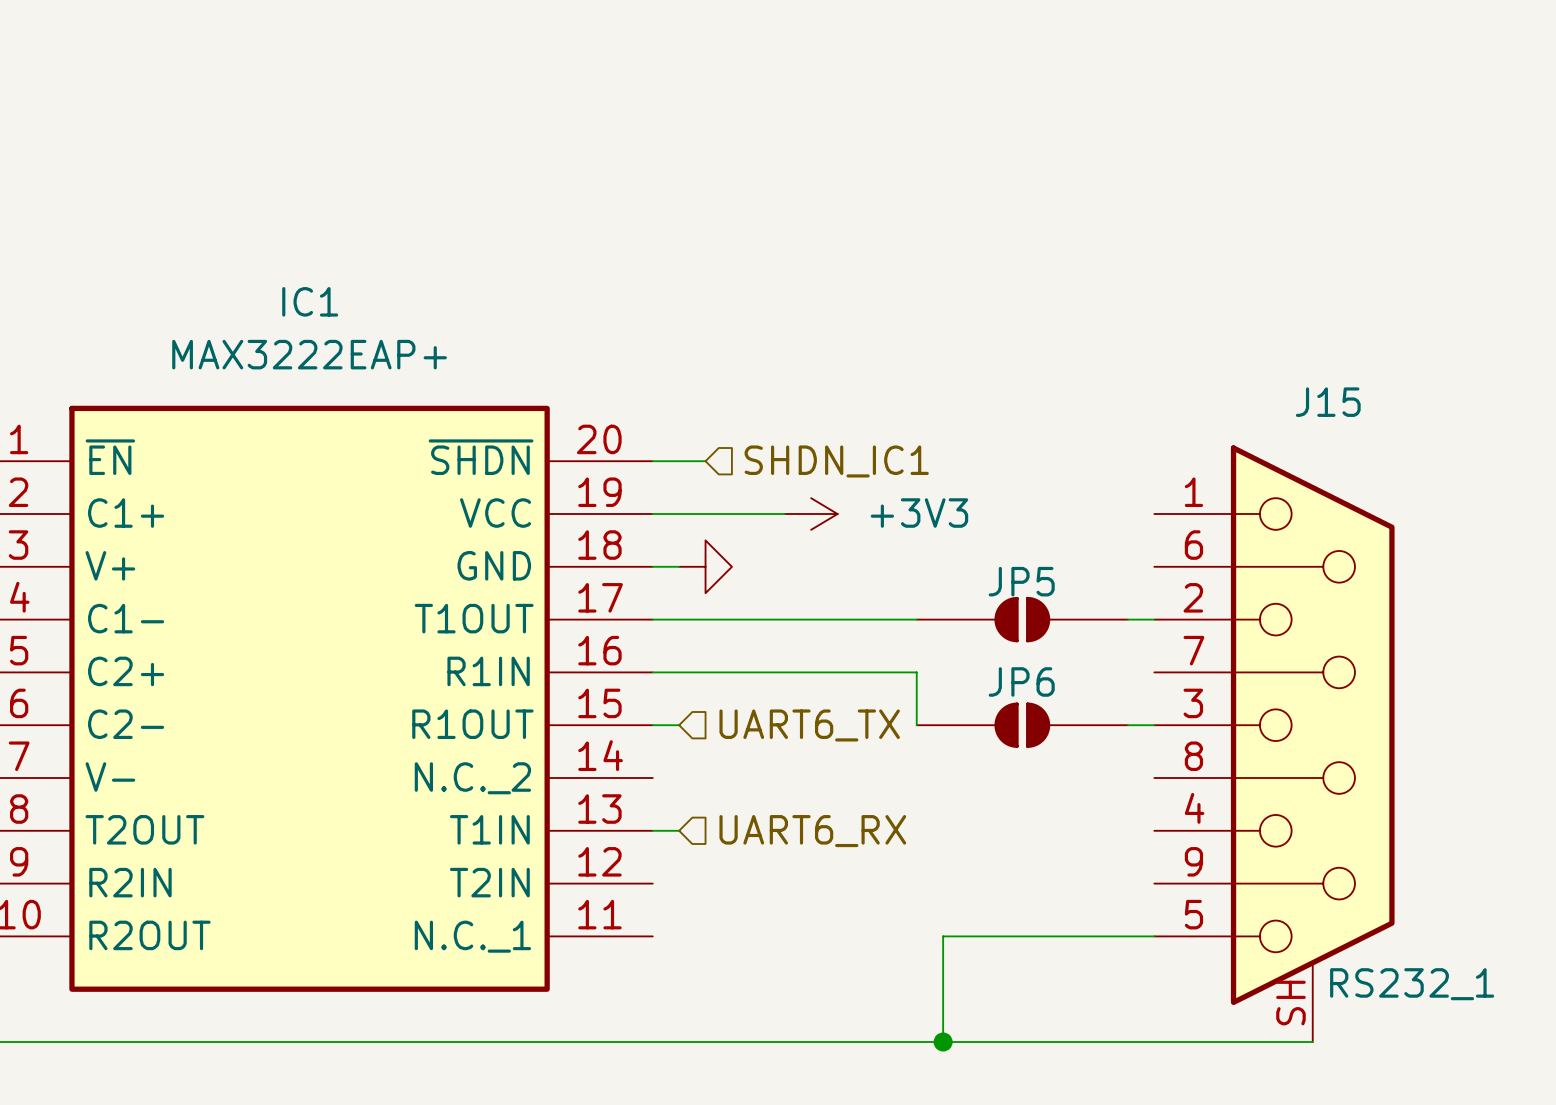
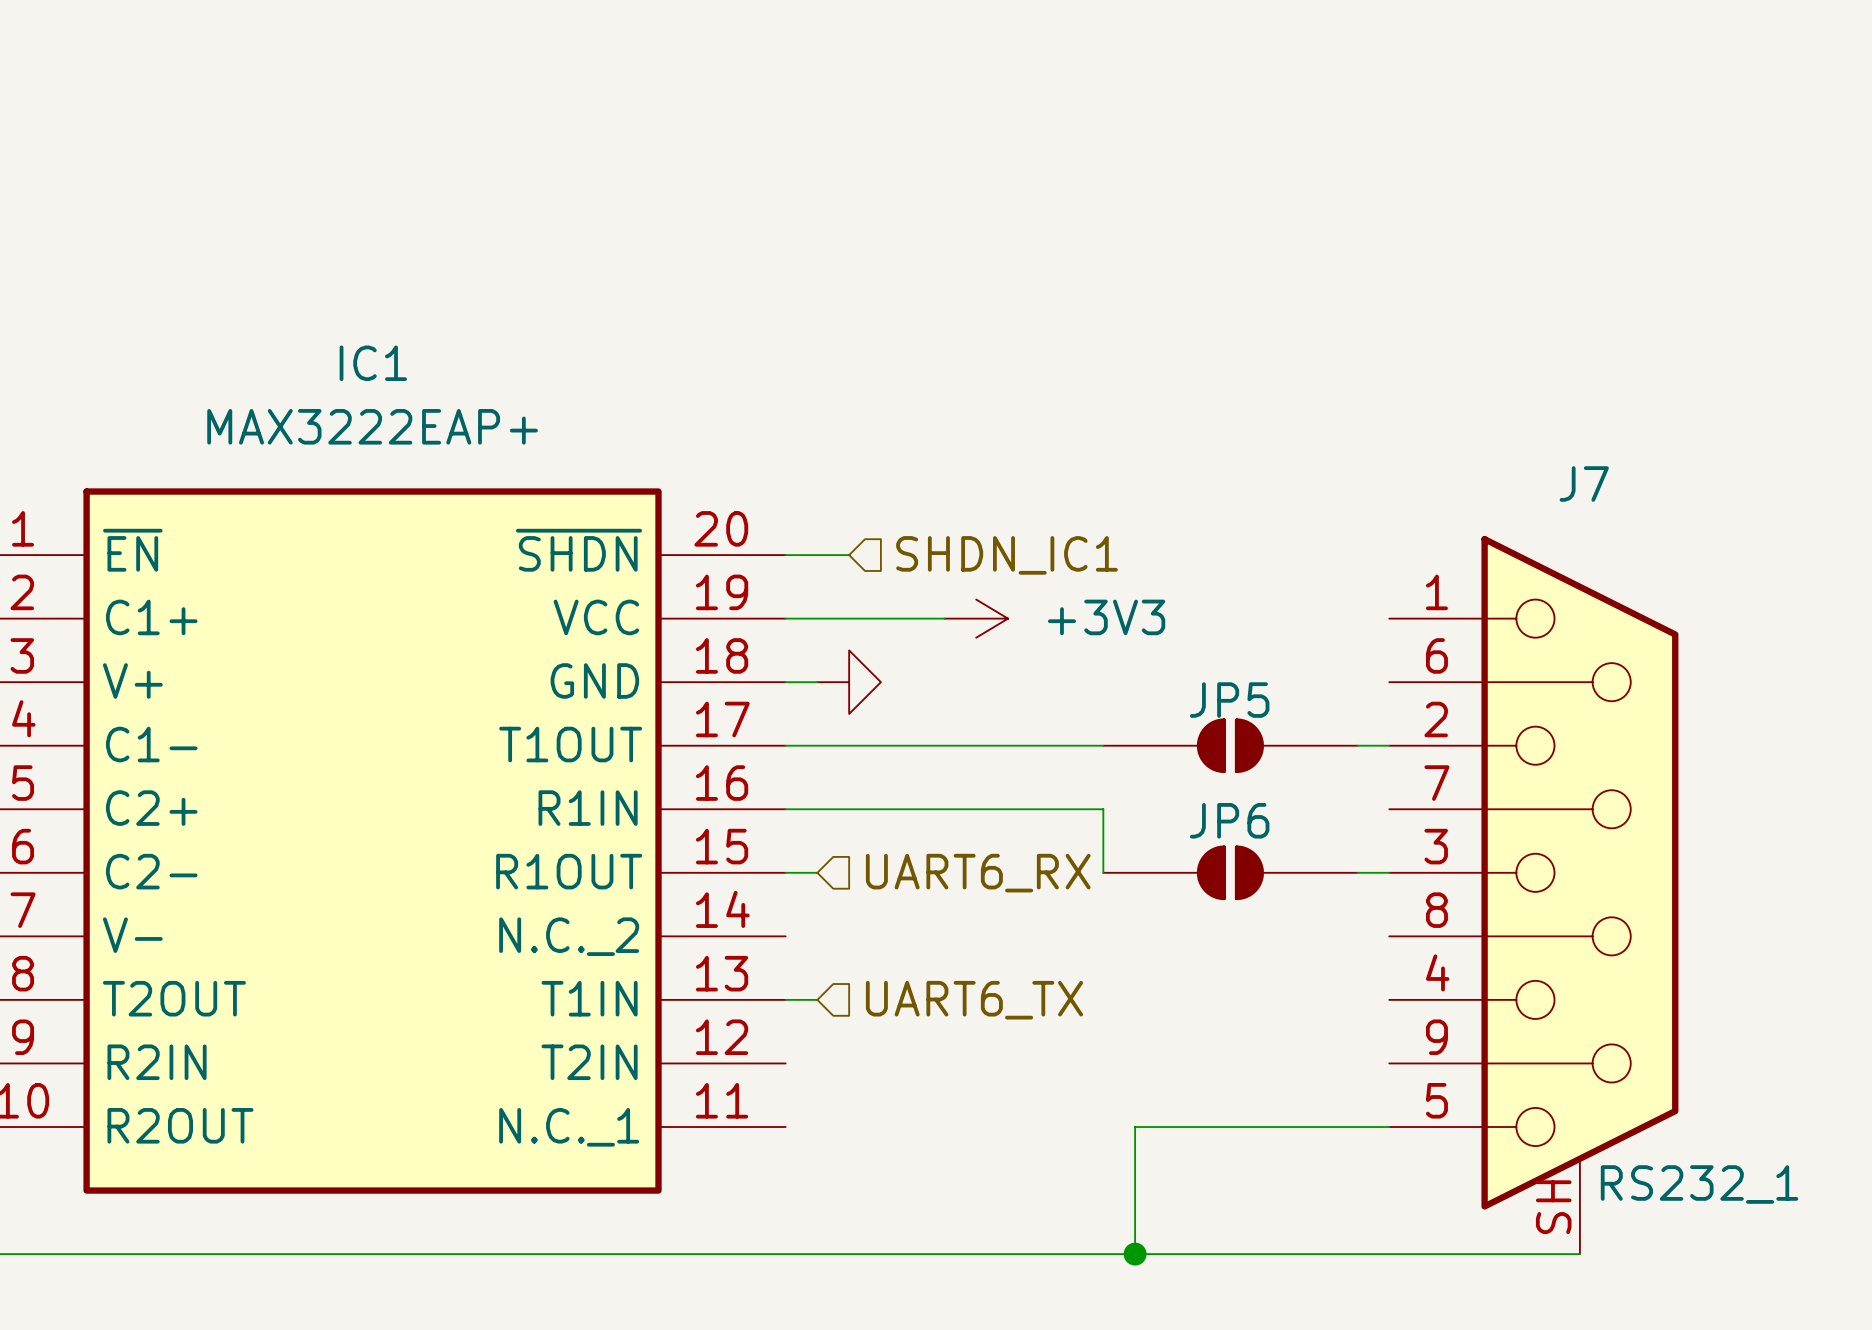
J15 name: J15 (1328, 402) -> J7 (1584, 483)
hierarchical label: UART6_TX (809, 725) -> UART6_RX (978, 873)
hierarchical label: UART6_RX (812, 831) -> UART6_TX (974, 1000)

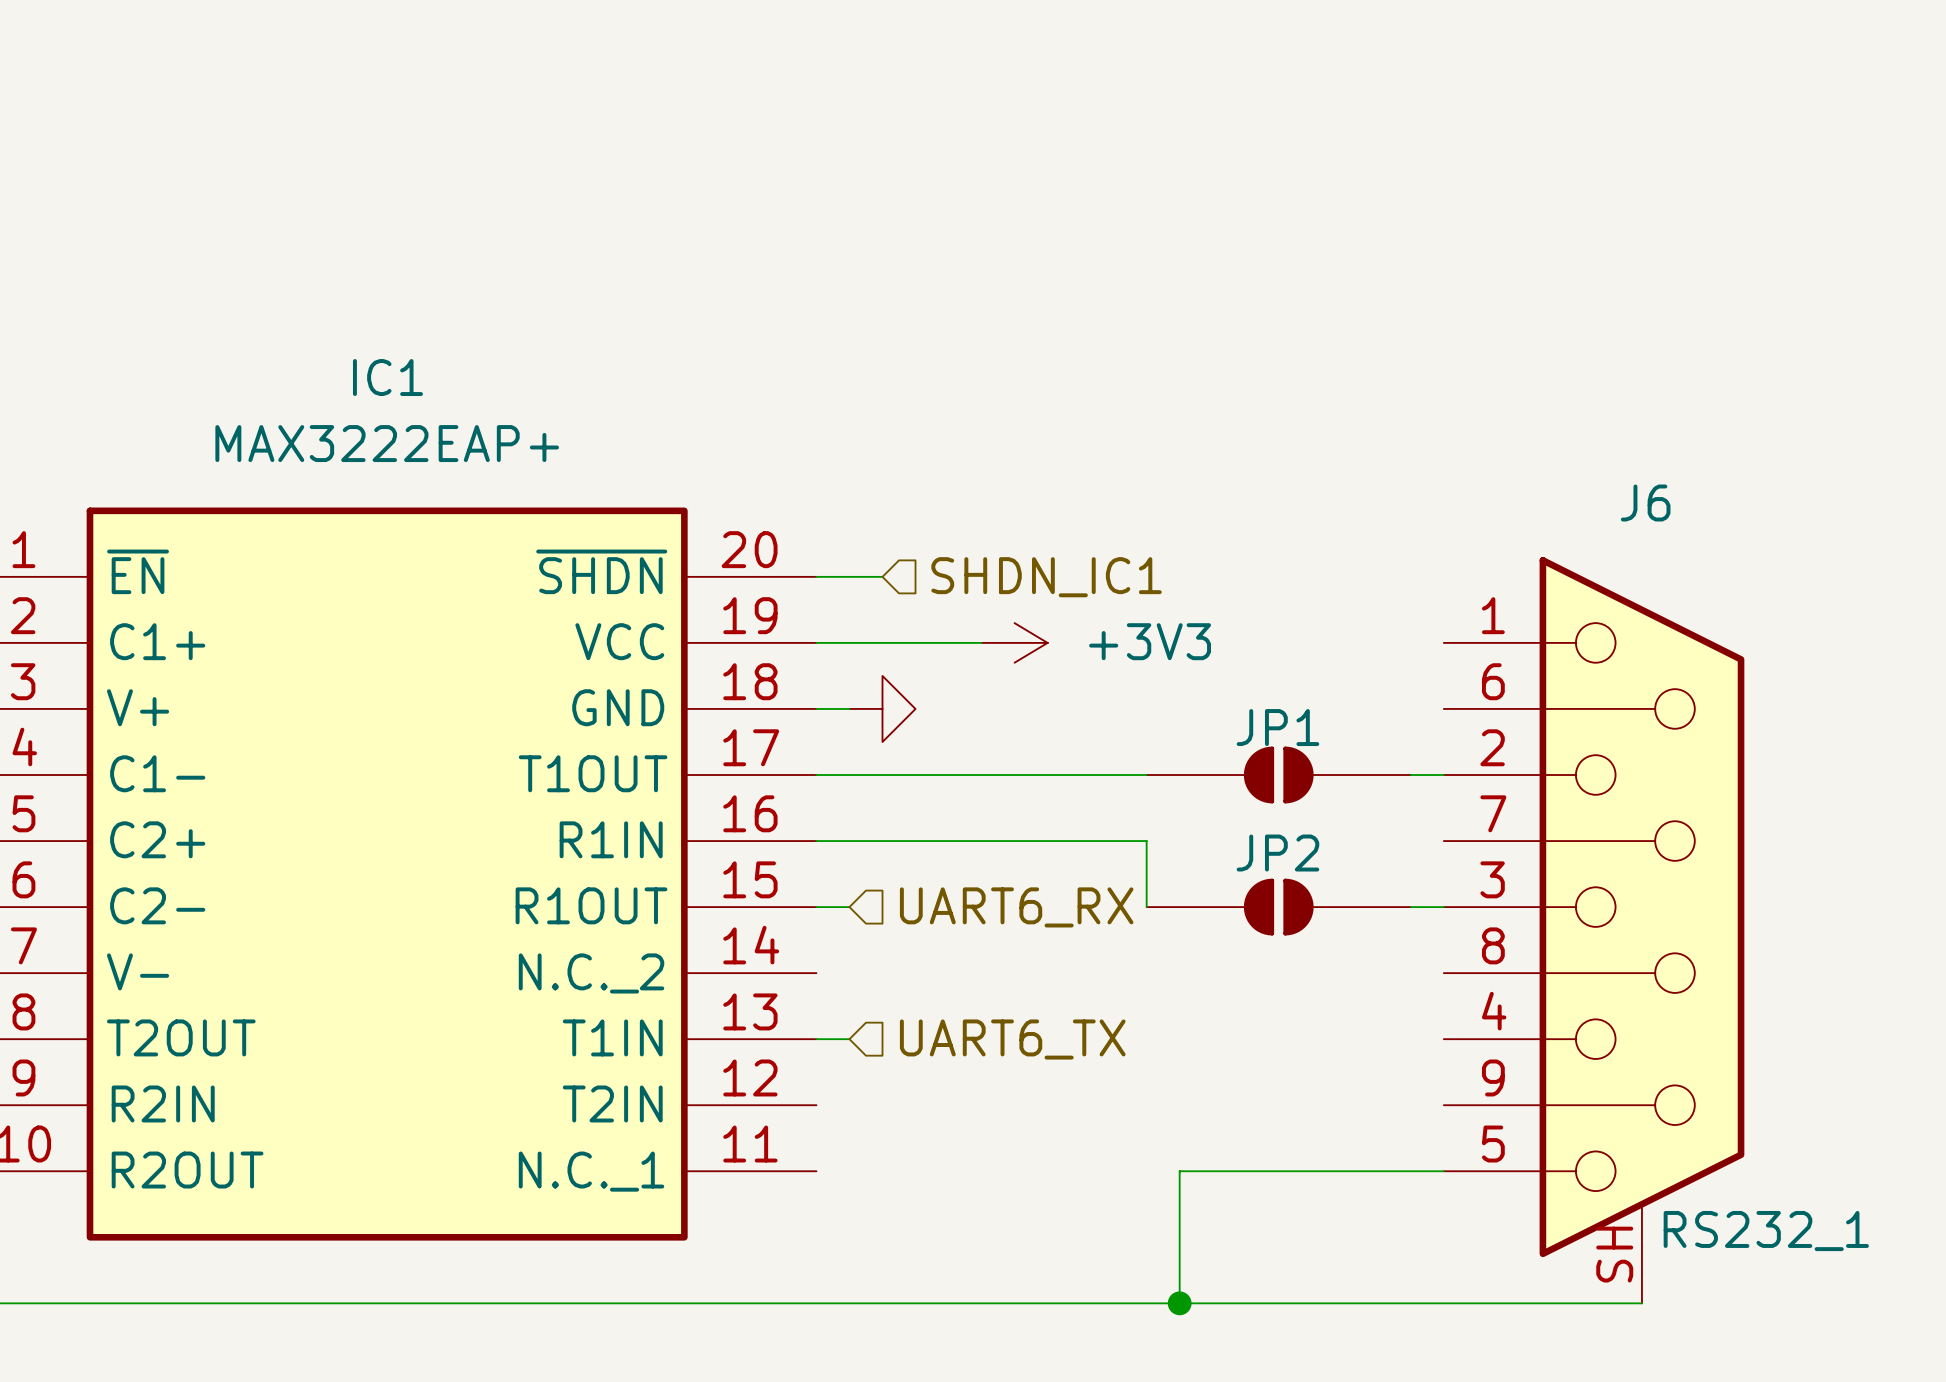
J7 name: J7 (1584, 483) -> J6 (1645, 503)
JP5 name: JP5 (1229, 700) -> JP1 (1277, 727)
JP6 name: JP6 (1229, 820) -> JP2 (1277, 853)

